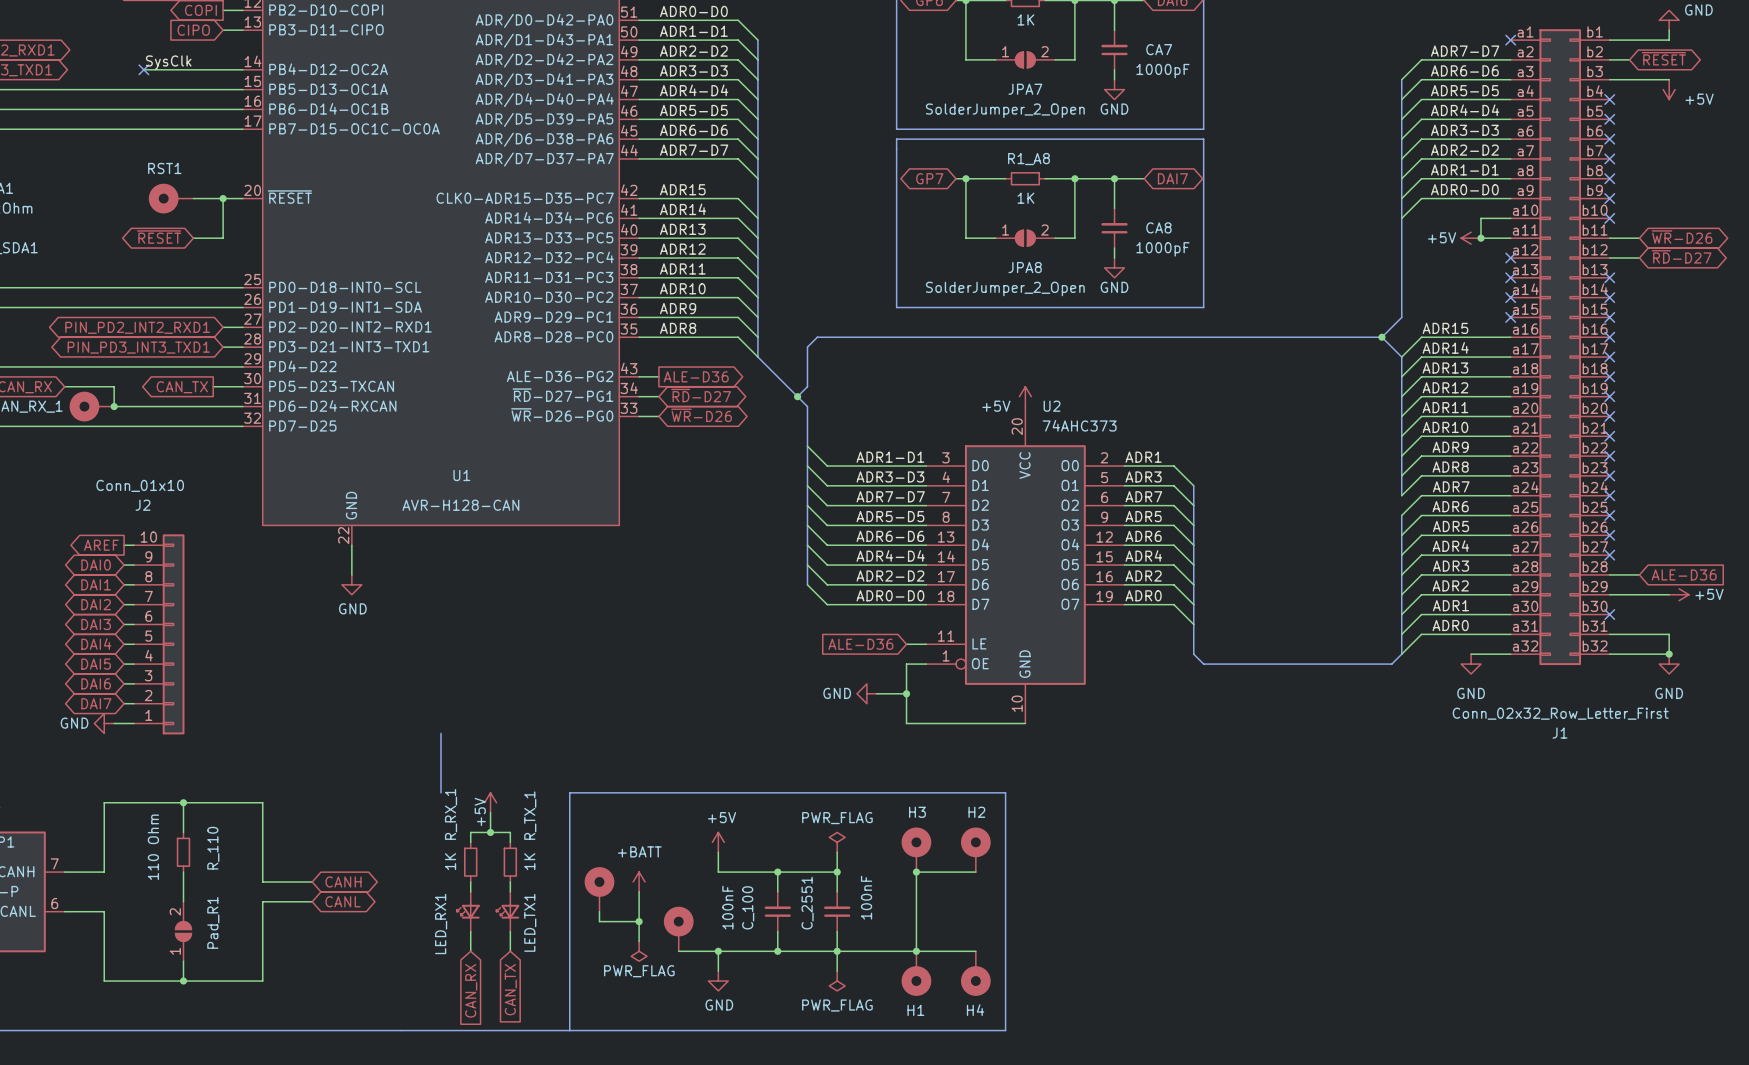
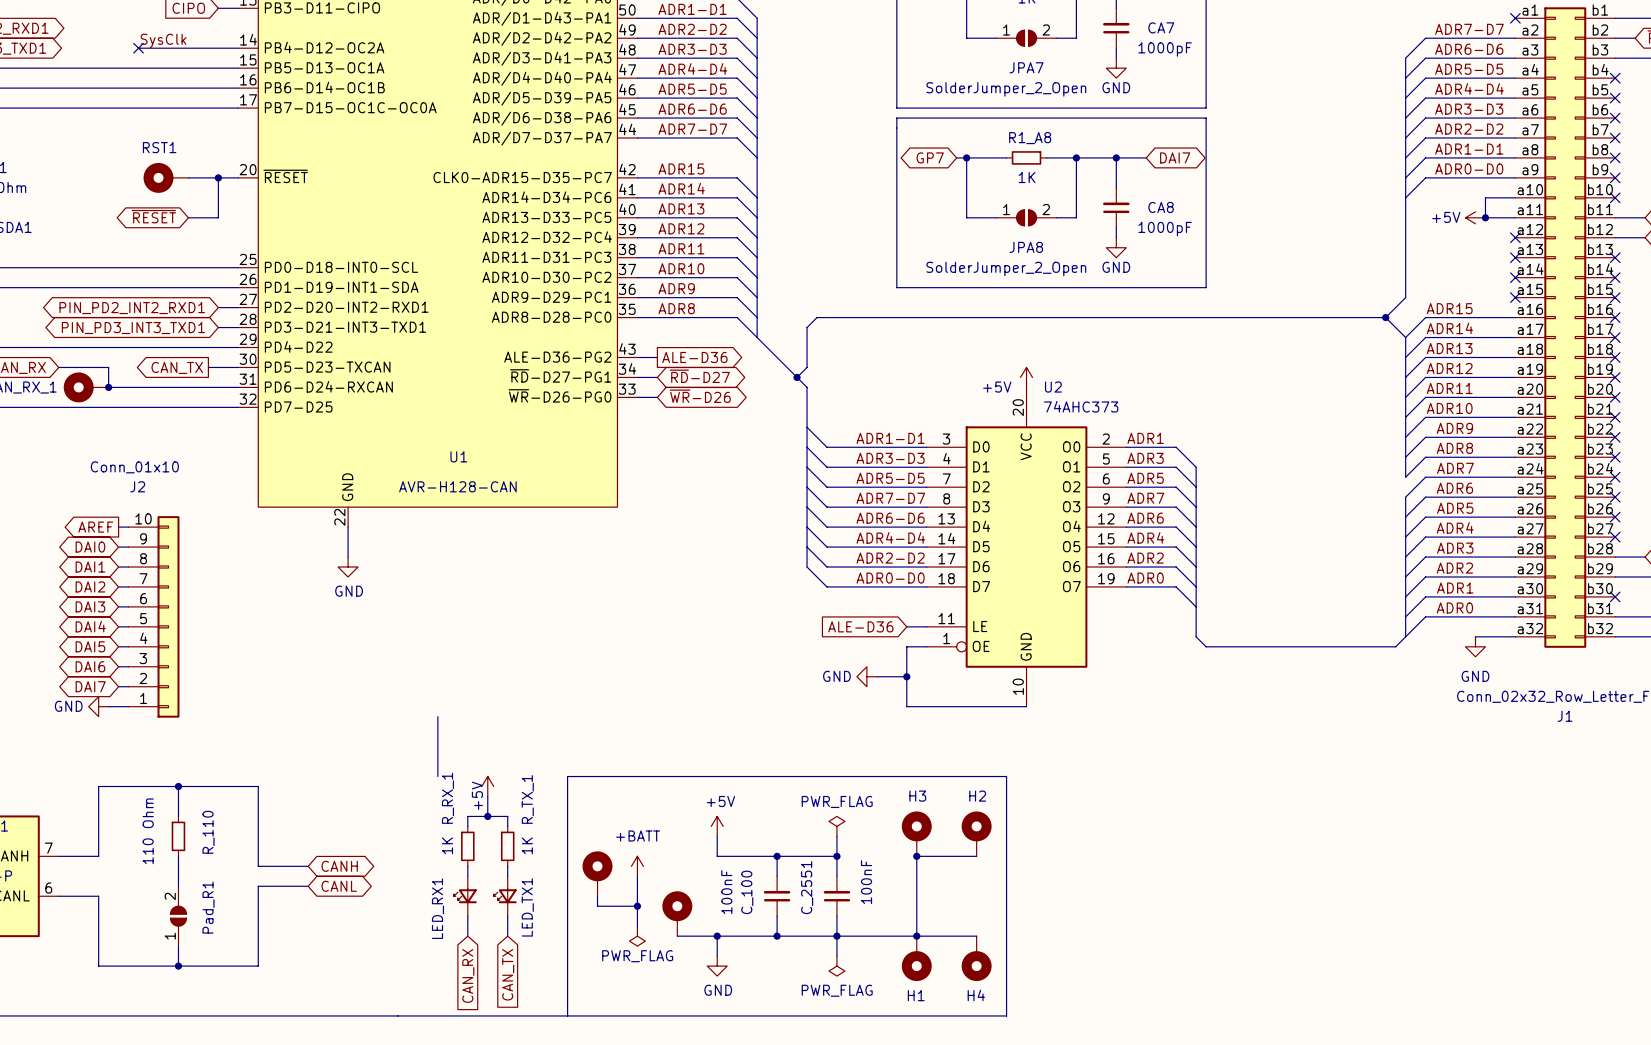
label: ADR7-D7 (890, 496) -> ADR5-D5 (890, 478)
label: ADR7 (1143, 496) -> ADR5 (1145, 478)
label: ADR5-D5 (890, 516) -> ADR7-D7 (890, 498)
label: ADR5 (1143, 516) -> ADR7 (1145, 498)

